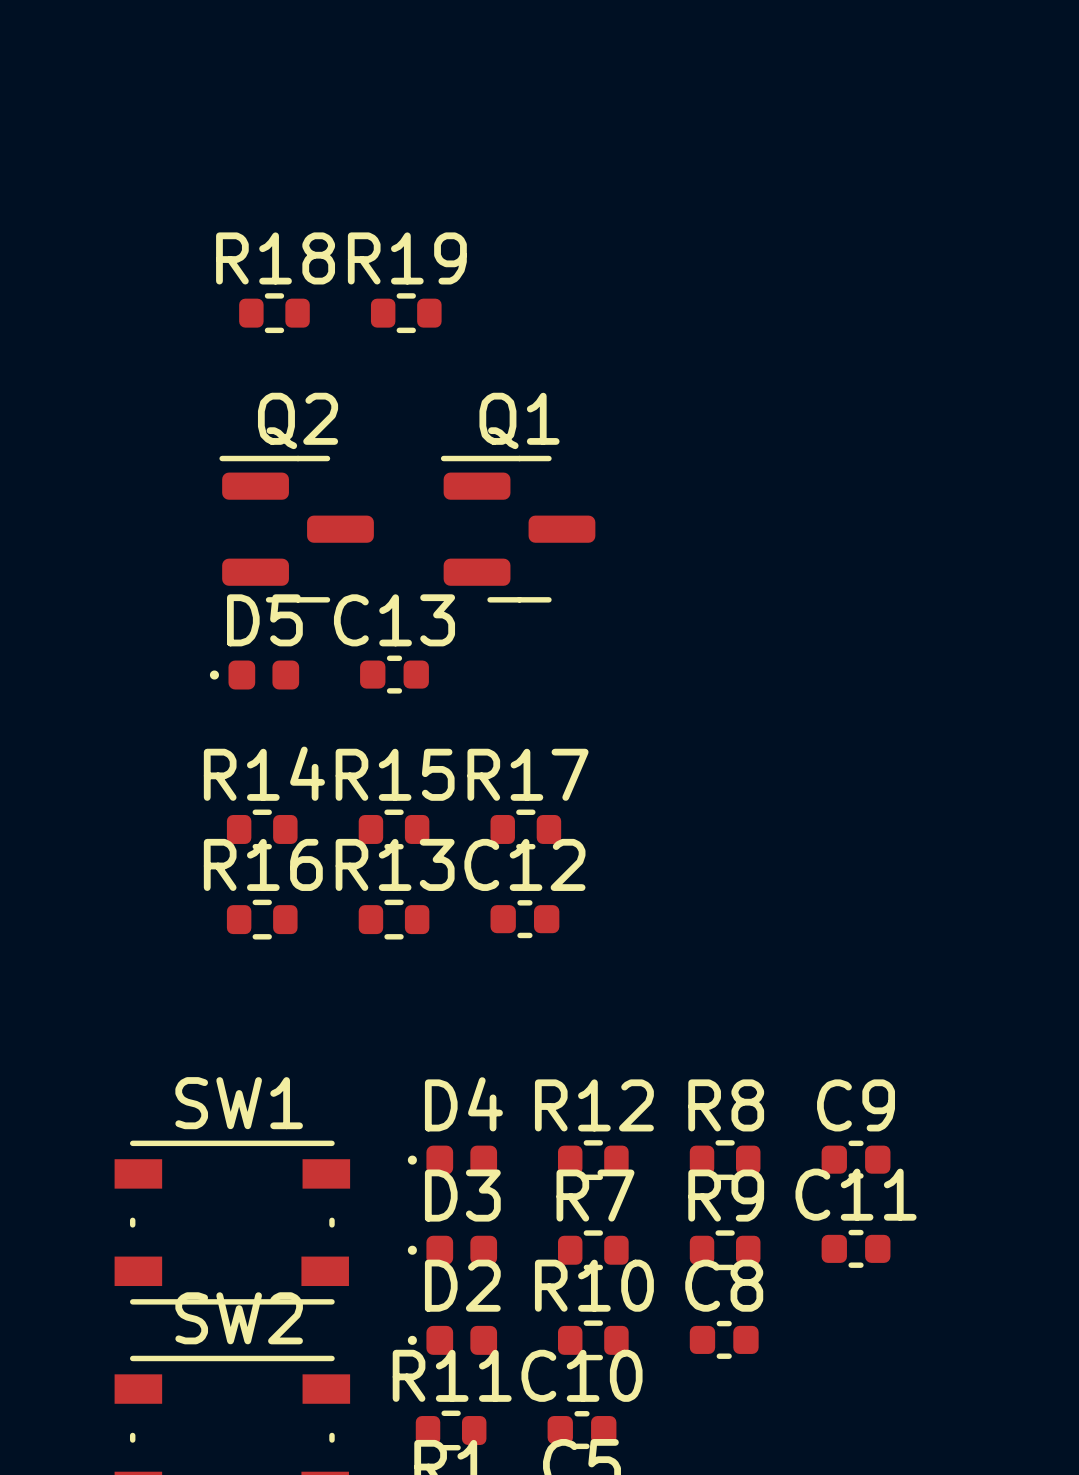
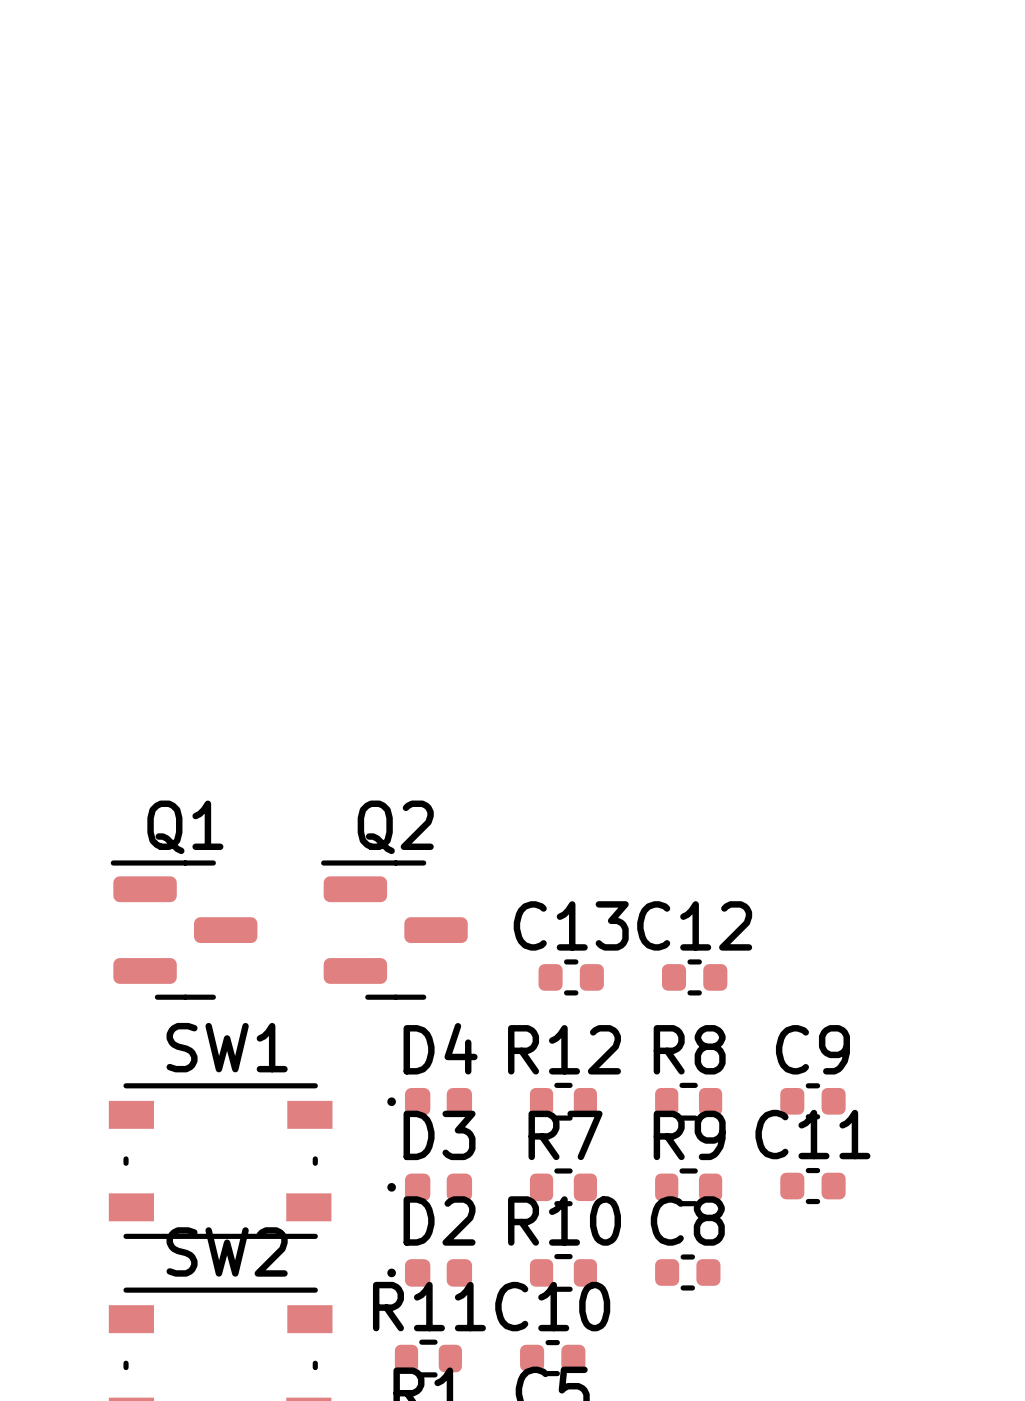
R18: (274, 313) -> none
R19: (406, 313) -> none
Q2 position: (296, 529) -> (394, 930)
Q1 position: (518, 529) -> (184, 930)
C13 position: (394, 674) -> (571, 977)
D5: (254, 675) -> none
R14: (262, 829) -> none
R15: (394, 829) -> none
R17: (525, 829) -> none
R16: (262, 919) -> none
R13: (394, 919) -> none
C12 position: (524, 919) -> (694, 977)

